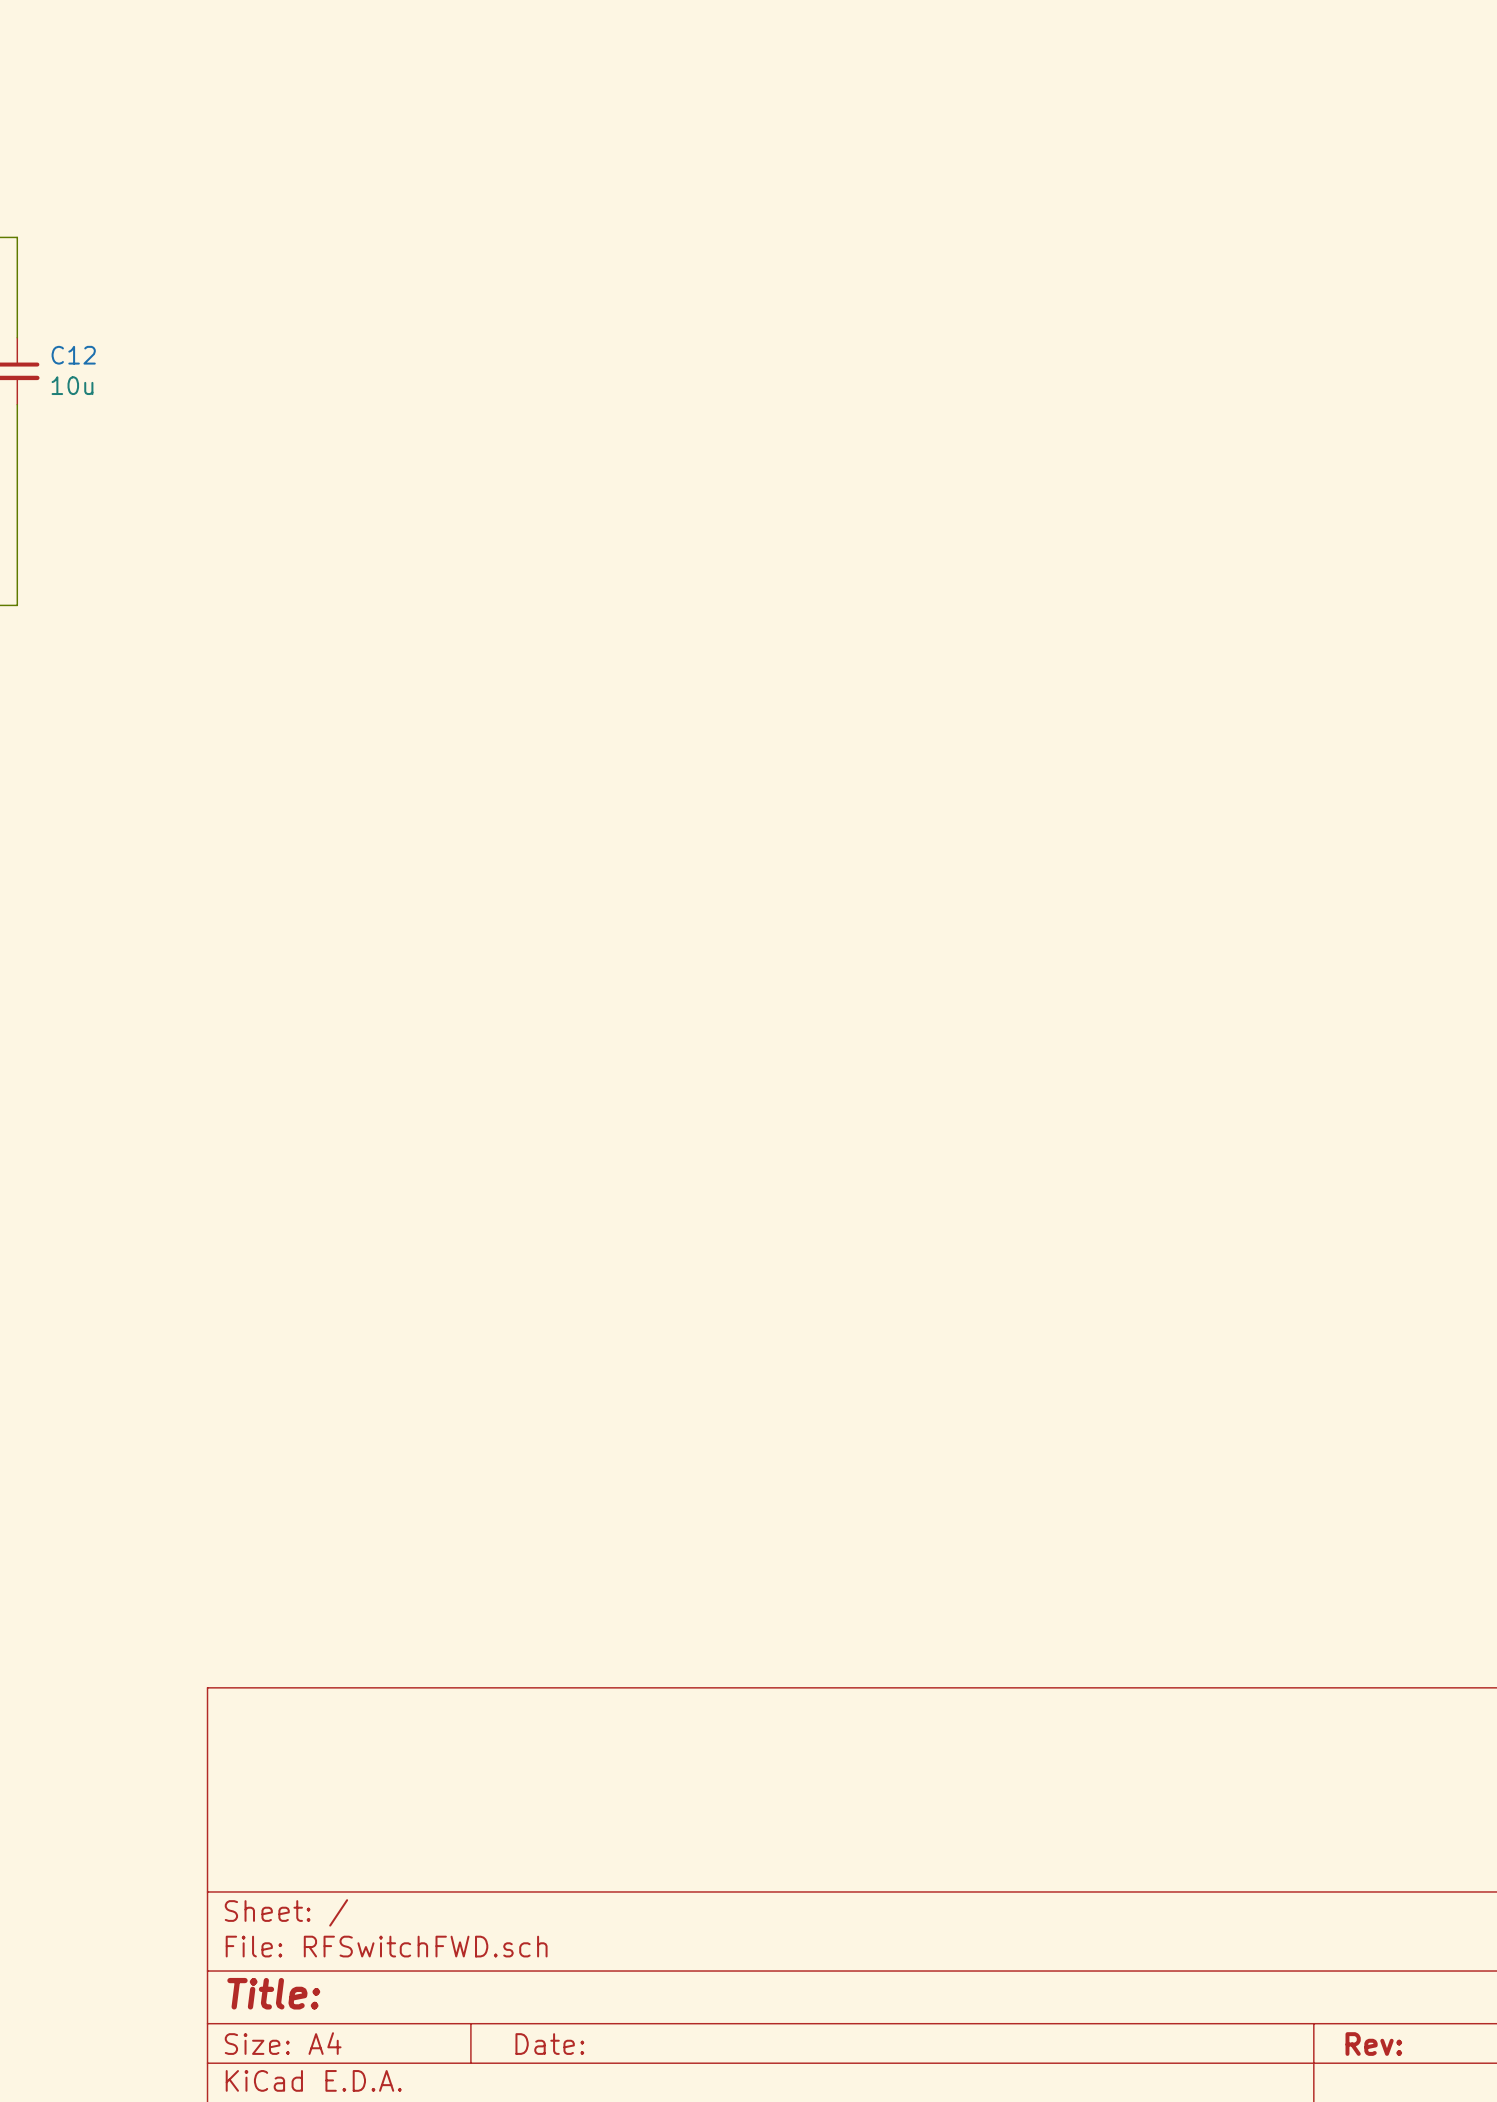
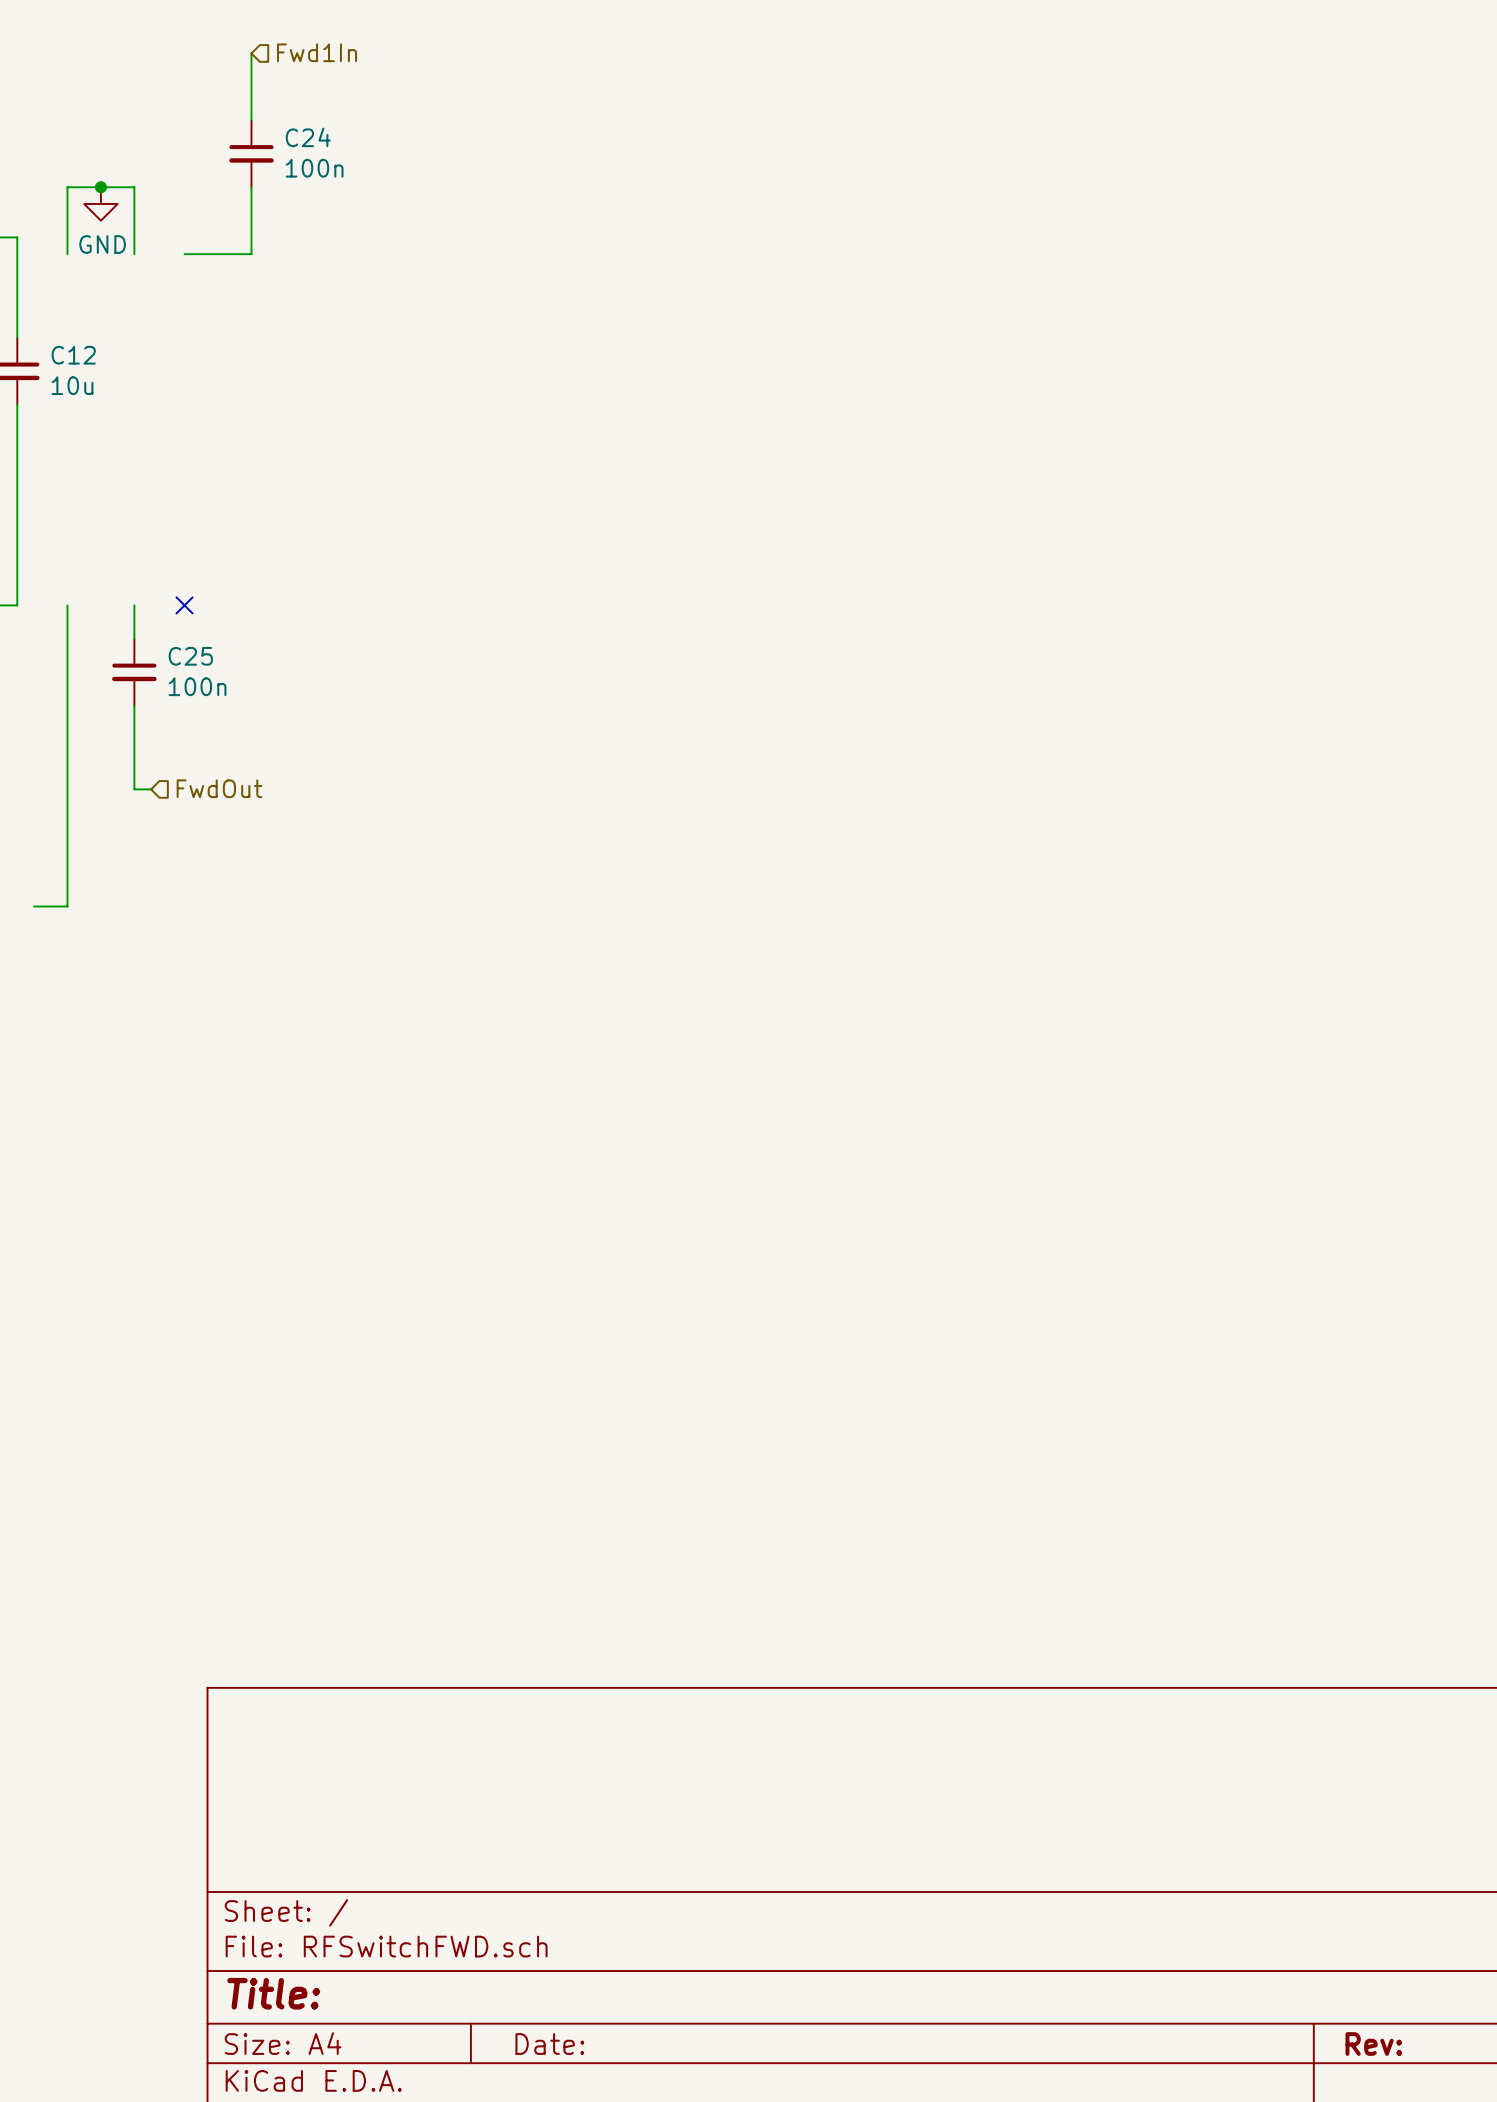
hierarchical label: none -> Fwd1In (317, 52)
wire: none -> (251, 53) (251, 120)
C24: none -> 100n (251, 153)
junction: none -> (100, 187)
wire: none -> (251, 187) (251, 254) (184, 254)
power symbol: none -> GND (100, 203)
wire: none -> (67, 254) (67, 187) (134, 187) (134, 254)
wire: none -> (67, 605) (67, 906) (34, 906)
wire: none -> (134, 605) (134, 638)
no-connect mark: none -> (184, 605)
C25: none -> 100n (134, 672)
wire: none -> (134, 705) (134, 789) (151, 789)
hierarchical label: none -> FwdOut (219, 788)

